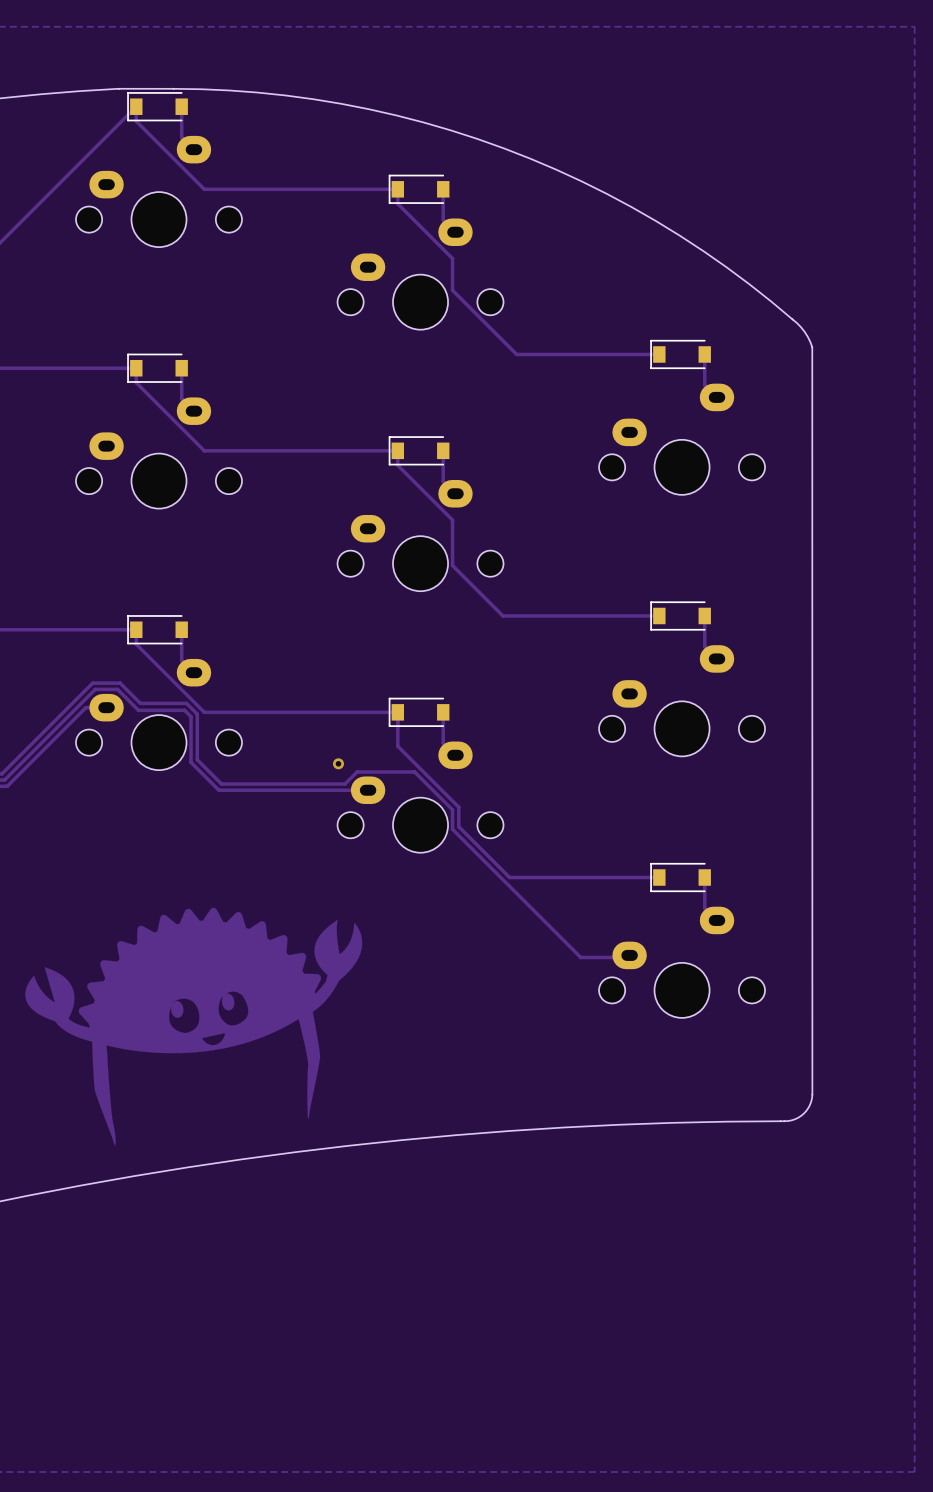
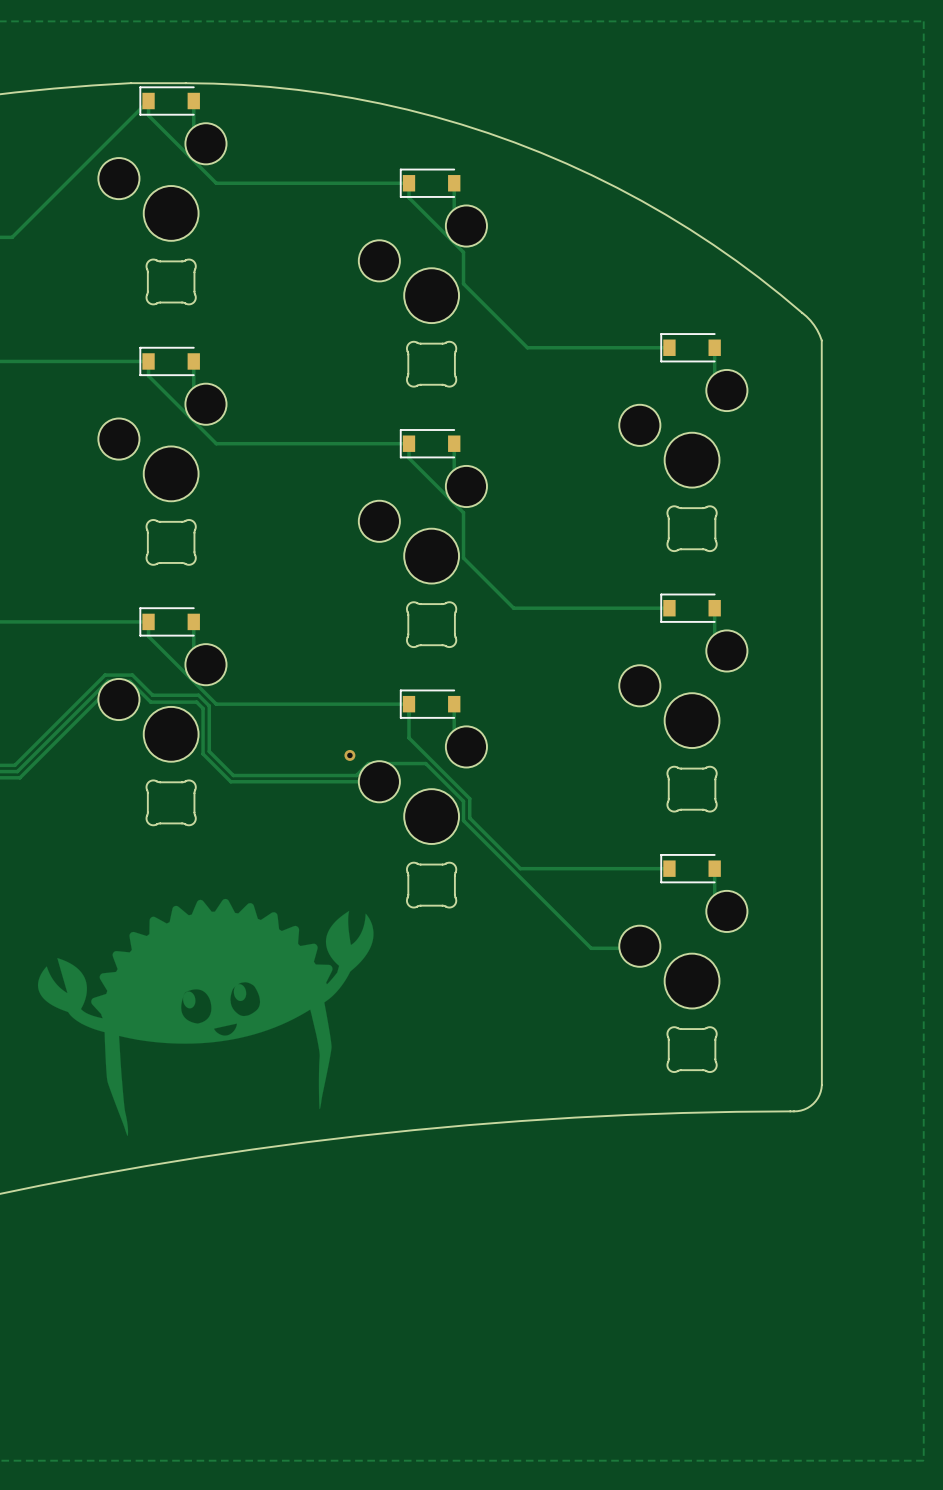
part: (159, 191) -> none
part: none -> (162, 214)
part: (420, 274) -> none
part: none -> (422, 296)
part: (682, 439) -> none
part: (159, 453) -> none
part: none -> (683, 460)
part: none -> (162, 474)
part: (420, 535) -> none
part: none -> (422, 556)
part: (682, 700) -> none
part: (159, 714) -> none
part: none -> (683, 721)
part: none -> (162, 735)
part: (420, 797) -> none
part: none -> (422, 817)
part: (682, 962) -> none
part: none -> (683, 981)

